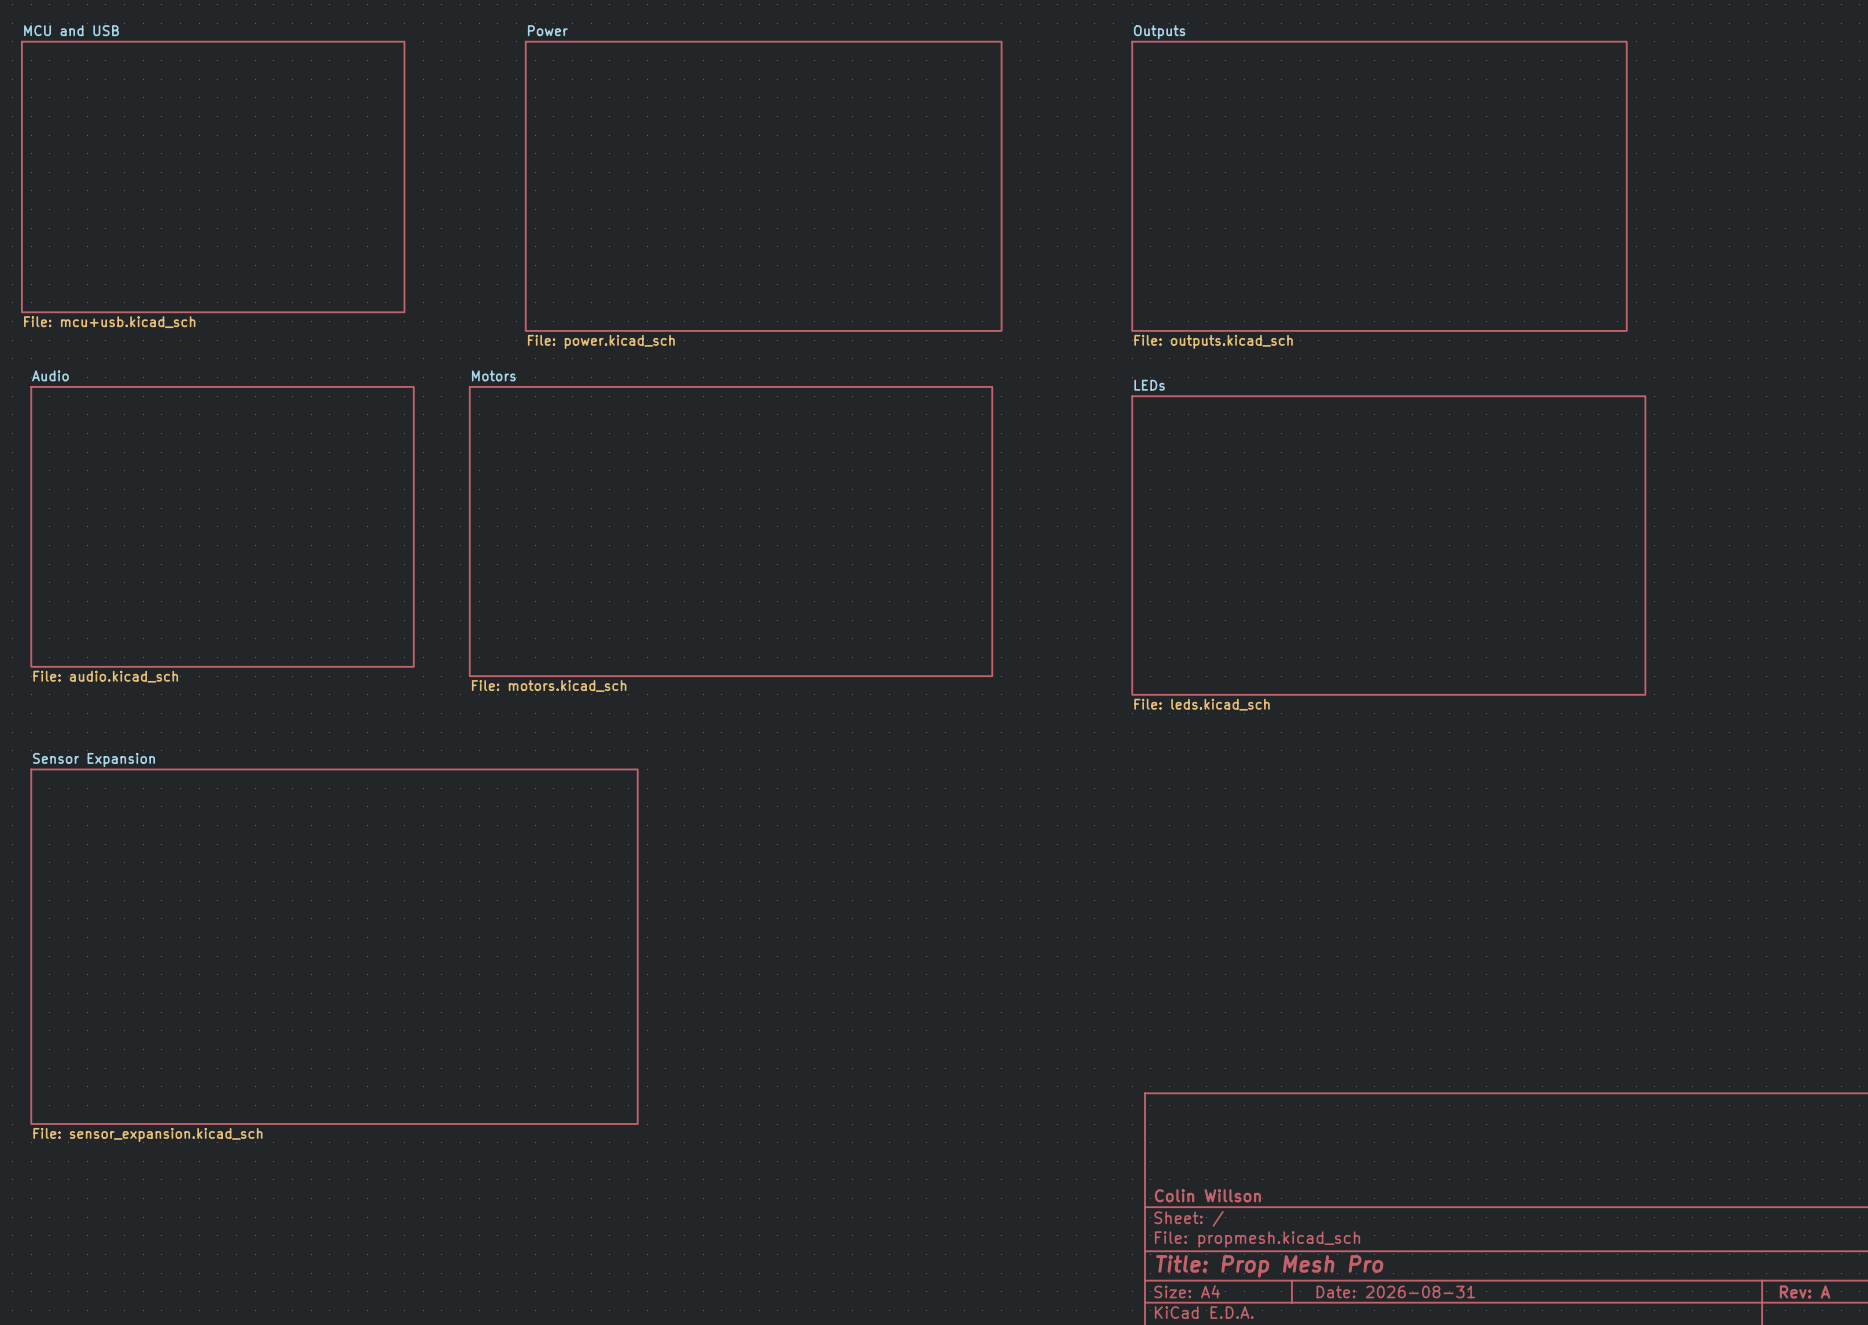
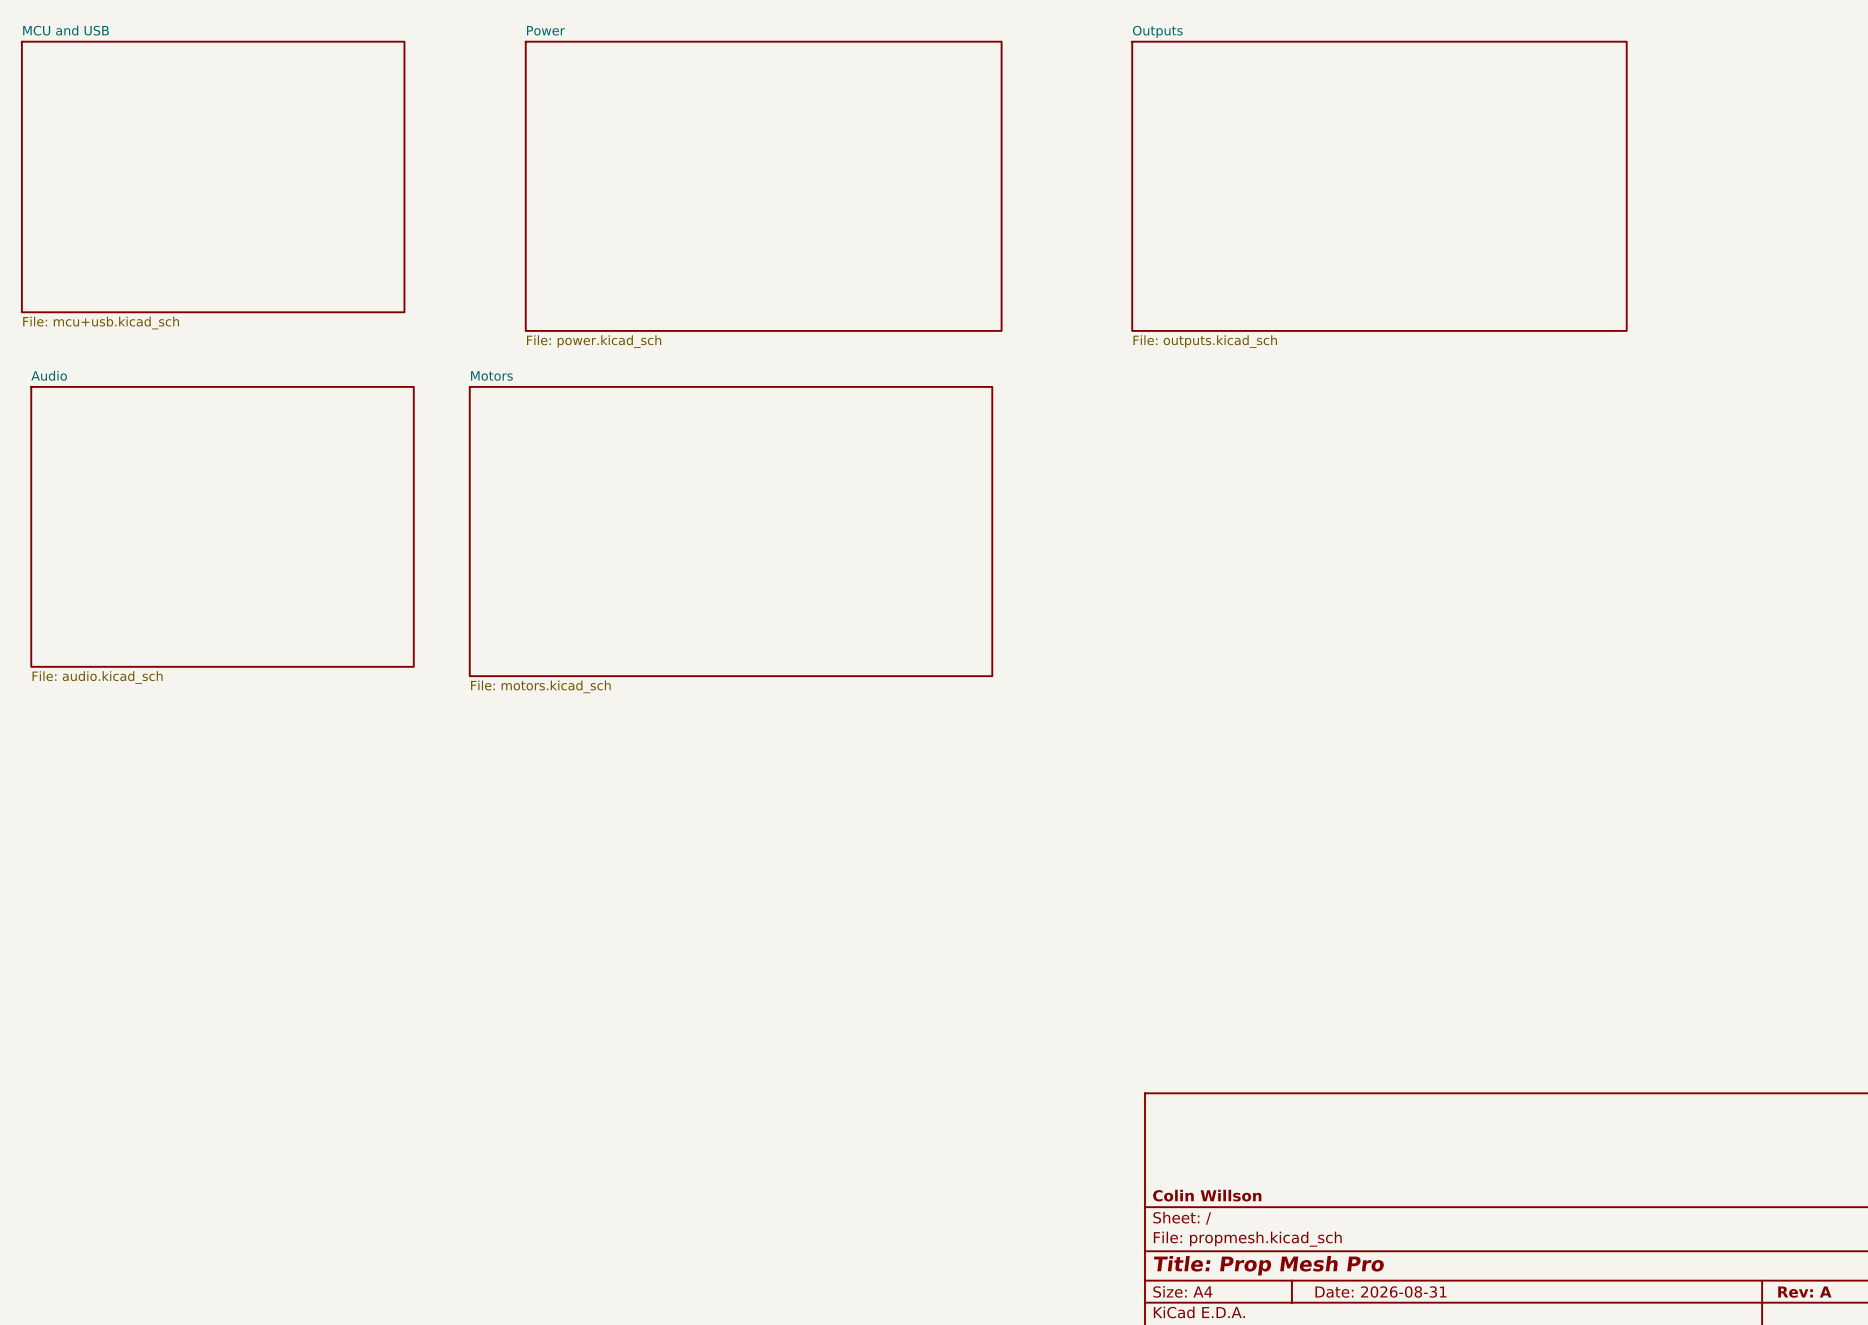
sheet LEDs: File: leds.kicad_sch (1388, 545) -> none
sheet Sensor Expansion: File: sensor_expansion.kicad_sch (334, 946) -> none

